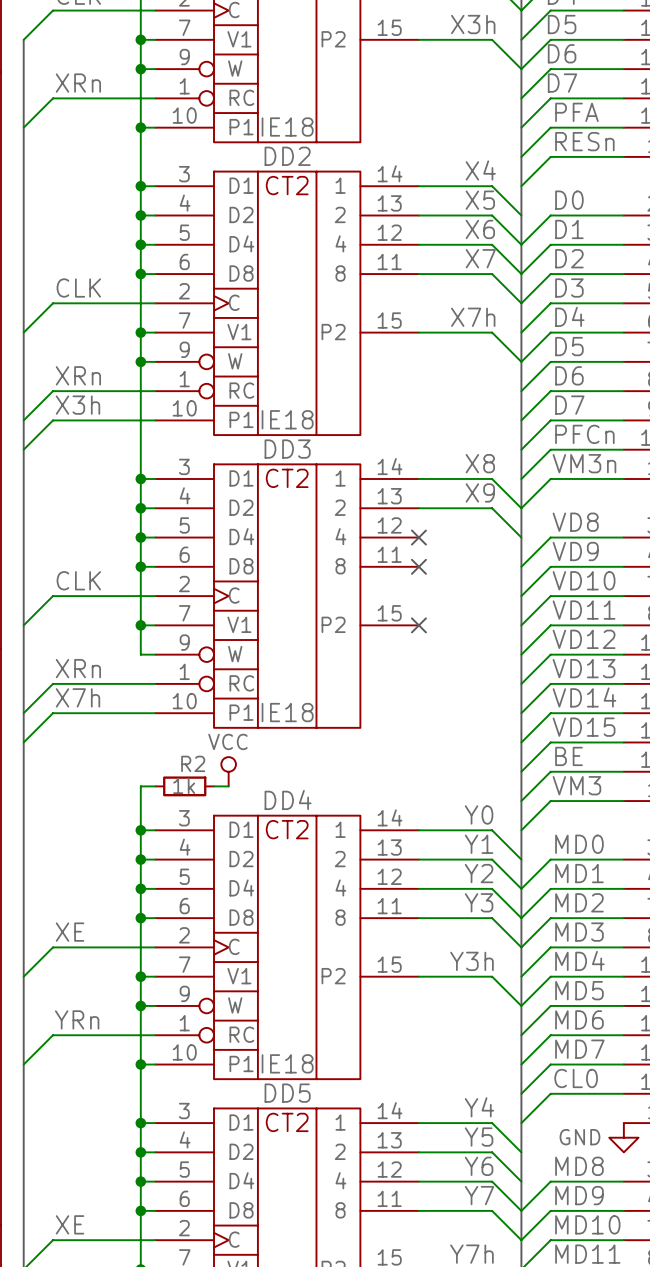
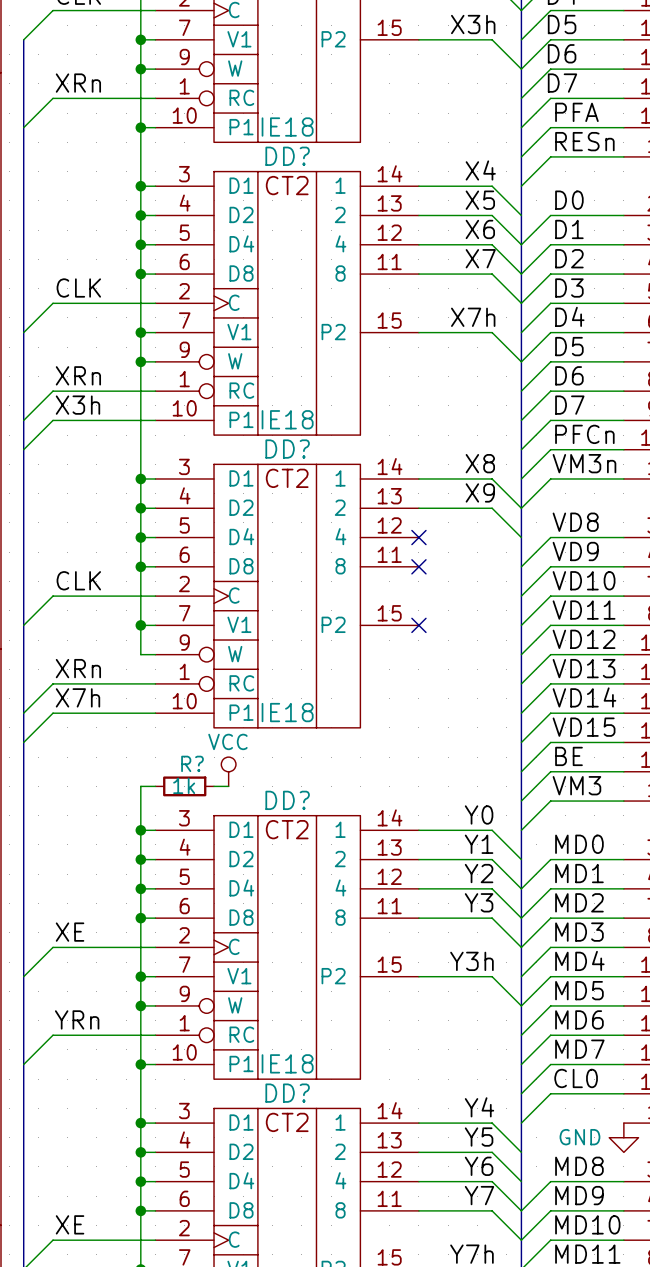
DD2 name: DD2 (287, 156) -> DD? (287, 156)
DD3 name: DD3 (287, 449) -> DD? (287, 449)
R2 name: R2 (193, 763) -> R? (192, 763)
DD4 name: DD4 (288, 799) -> DD? (287, 800)
DD5 name: DD5 (287, 1093) -> DD? (287, 1093)

